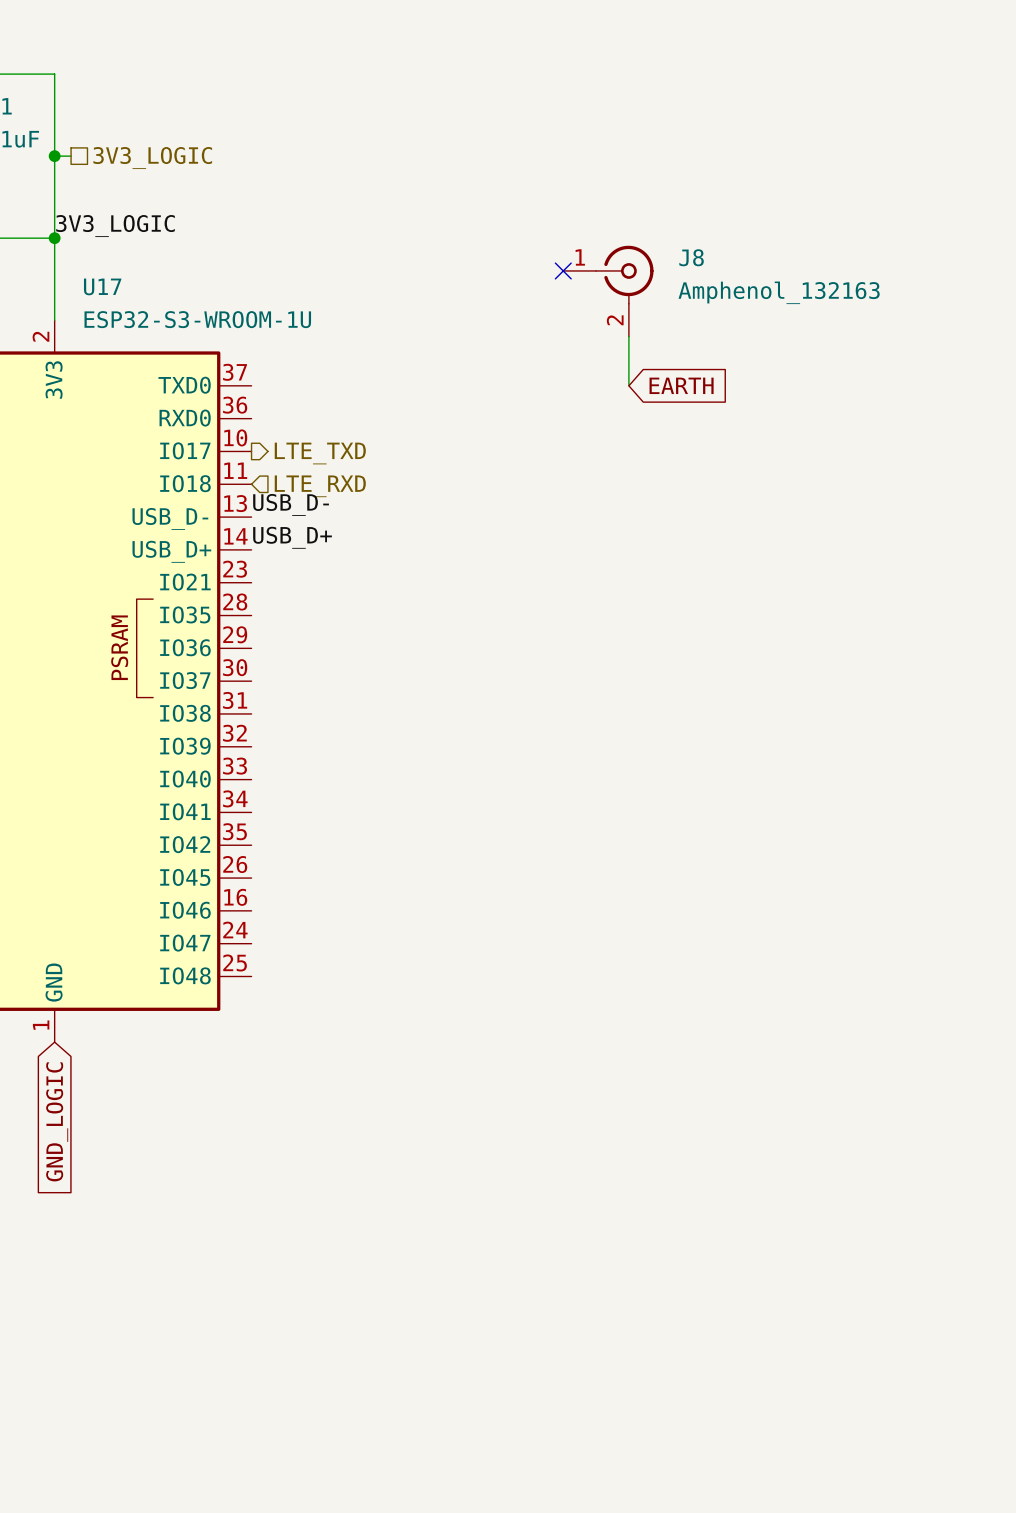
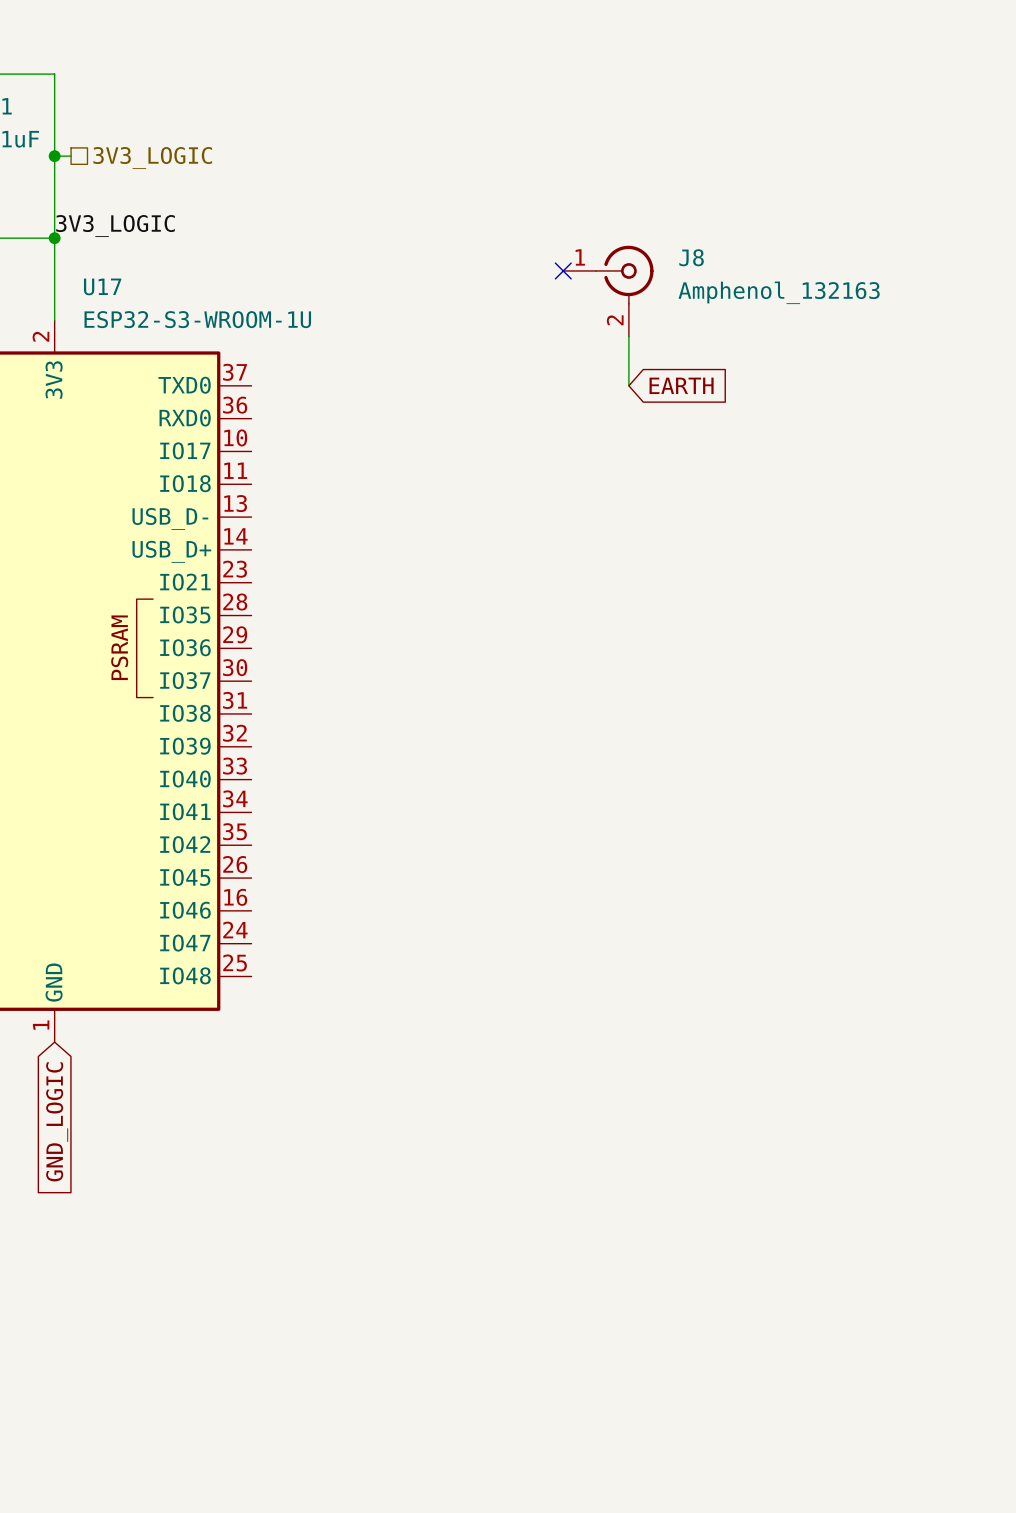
hierarchical label: LTE_TXD (320, 453) -> none
hierarchical label: LTE_RXD (320, 486) -> none
label: USB_D- (291, 504) -> none
label: USB_D+ (292, 537) -> none

